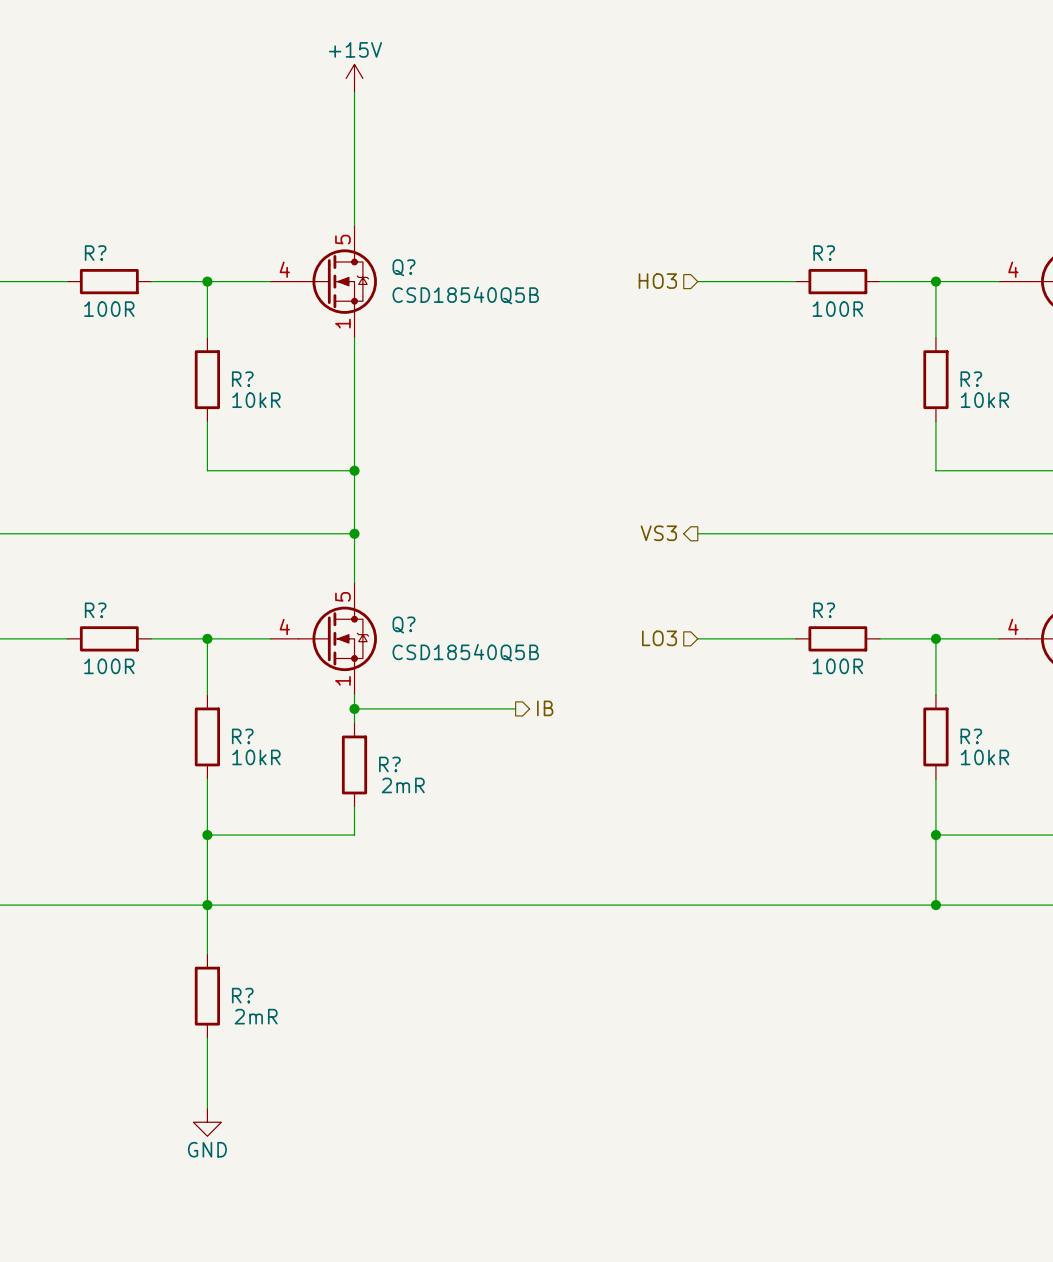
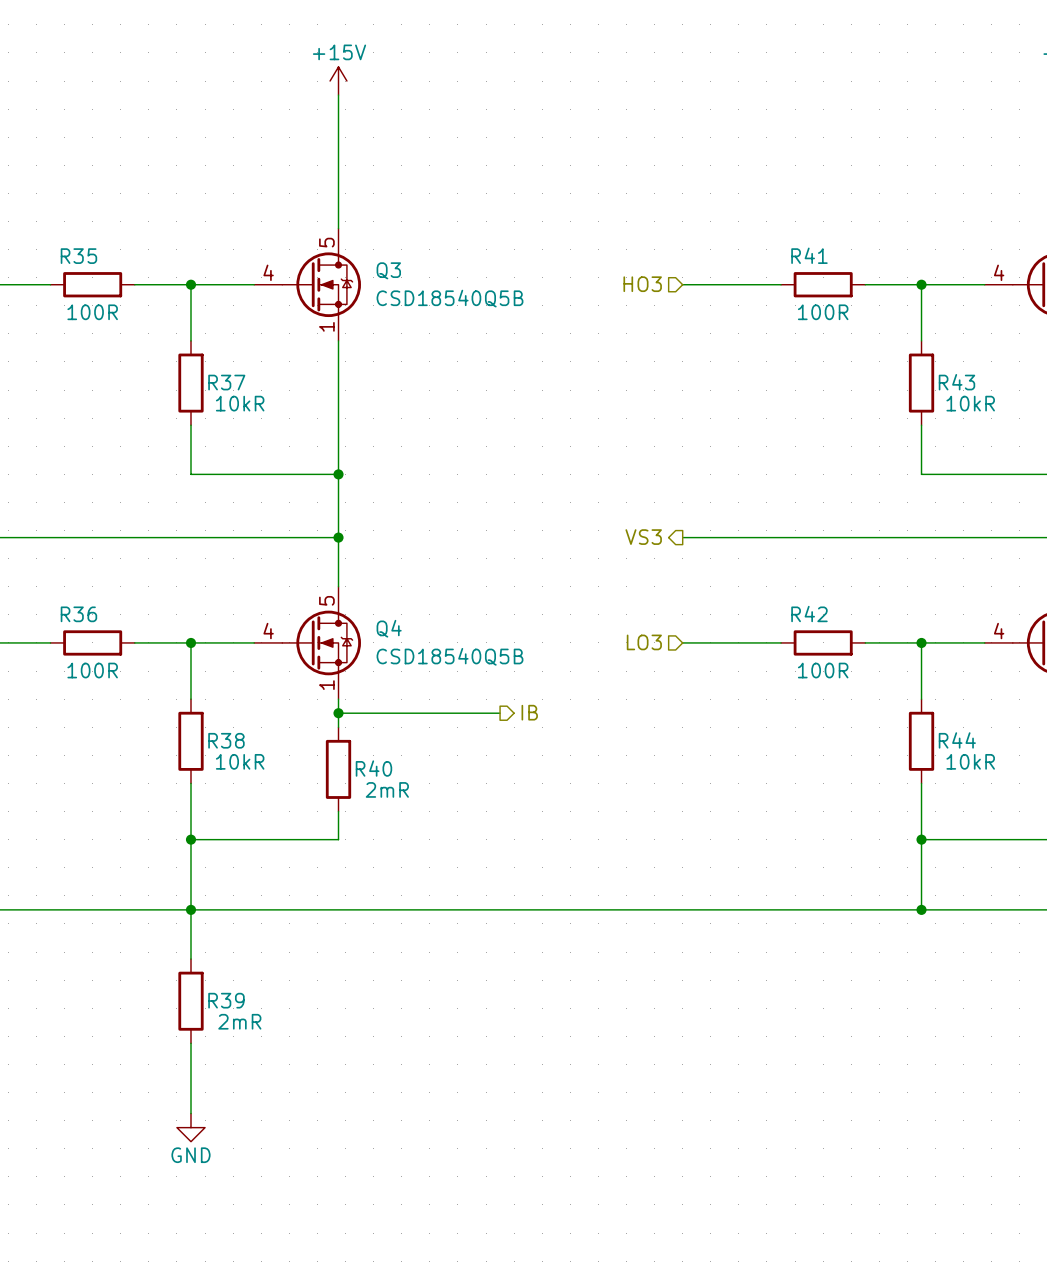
R? name: R? (95, 253) -> R35 (78, 256)
R? name: R? (824, 253) -> R41 (809, 255)
Q? name: Q? (403, 267) -> Q3 (388, 270)
R? name: R? (242, 379) -> R37 (226, 382)
R? name: R? (971, 379) -> R43 (956, 382)
R? name: R? (95, 610) -> R36 (78, 614)
R? name: R? (824, 610) -> R42 (809, 614)
Q? name: Q? (403, 625) -> Q4 (389, 628)
R? name: R? (242, 736) -> R38 (226, 740)
R? name: R? (971, 736) -> R44 (957, 740)
R? name: R? (389, 764) -> R40 (373, 768)
R? name: R? (242, 995) -> R39 (226, 1000)

